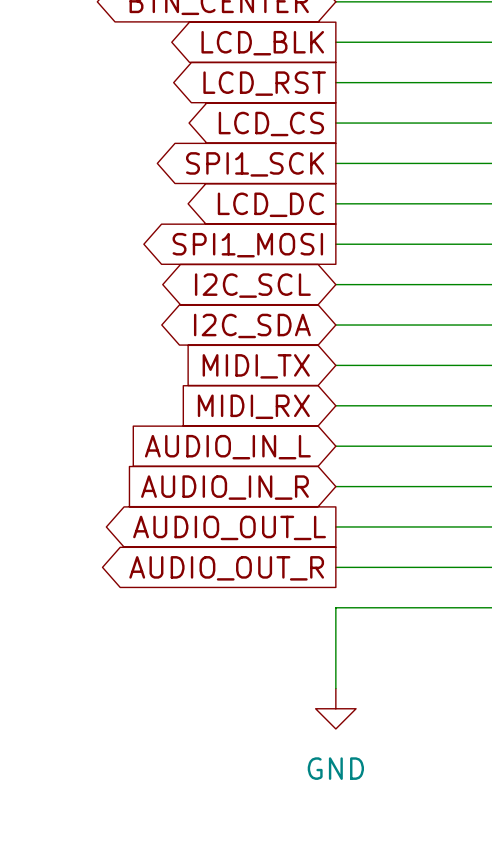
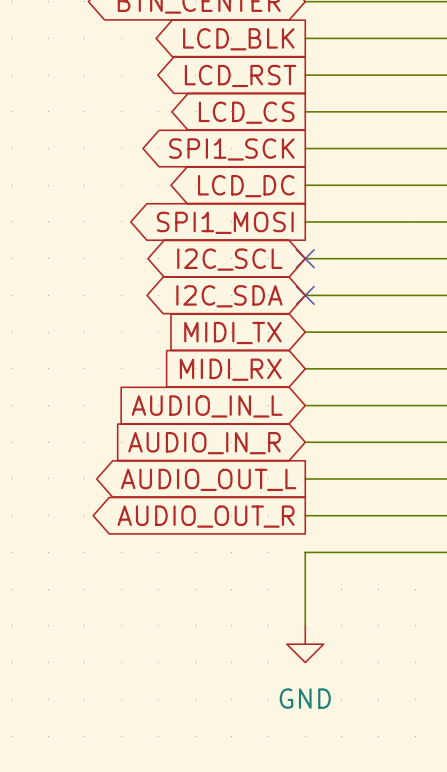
no-connect mark: none -> (305, 258)
no-connect mark: none -> (305, 295)

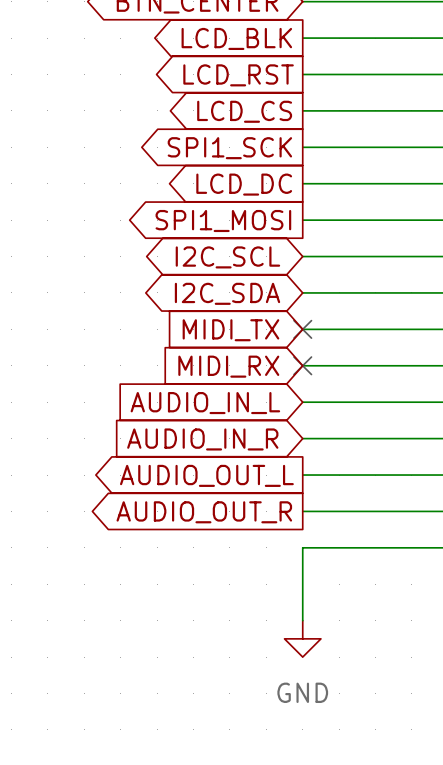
no-connect mark: (305, 258) -> none
no-connect mark: (305, 295) -> none
no-connect mark: none -> (302, 329)
no-connect mark: none -> (302, 365)

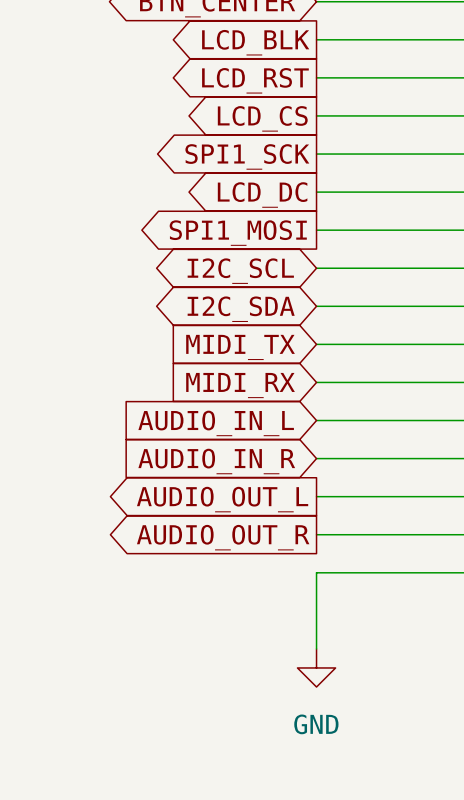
no-connect mark: (302, 329) -> none
no-connect mark: (302, 365) -> none

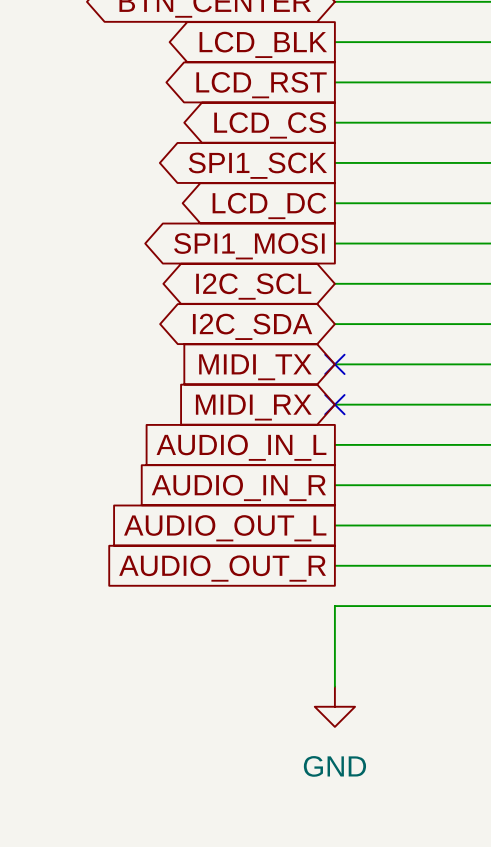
no-connect mark: none -> (334, 364)
no-connect mark: none -> (334, 404)
global label shape: input (216, 423) -> passive (241, 447)
global label shape: input (216, 461) -> passive (238, 487)
global label shape: output (222, 499) -> passive (225, 528)
global label shape: output (223, 537) -> passive (222, 568)

